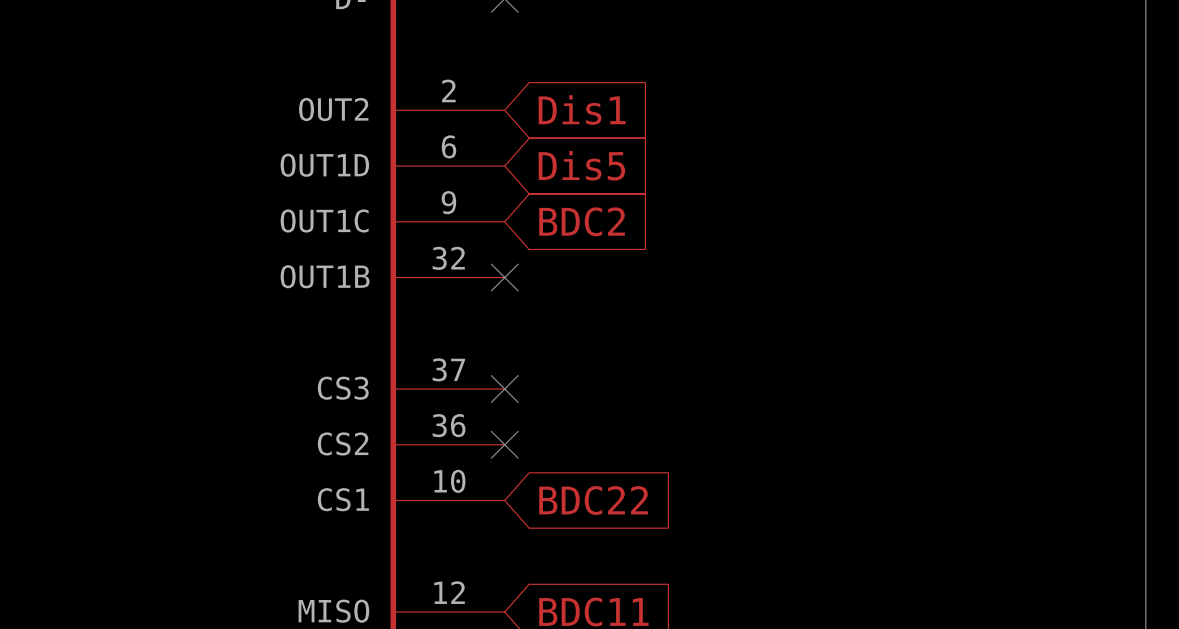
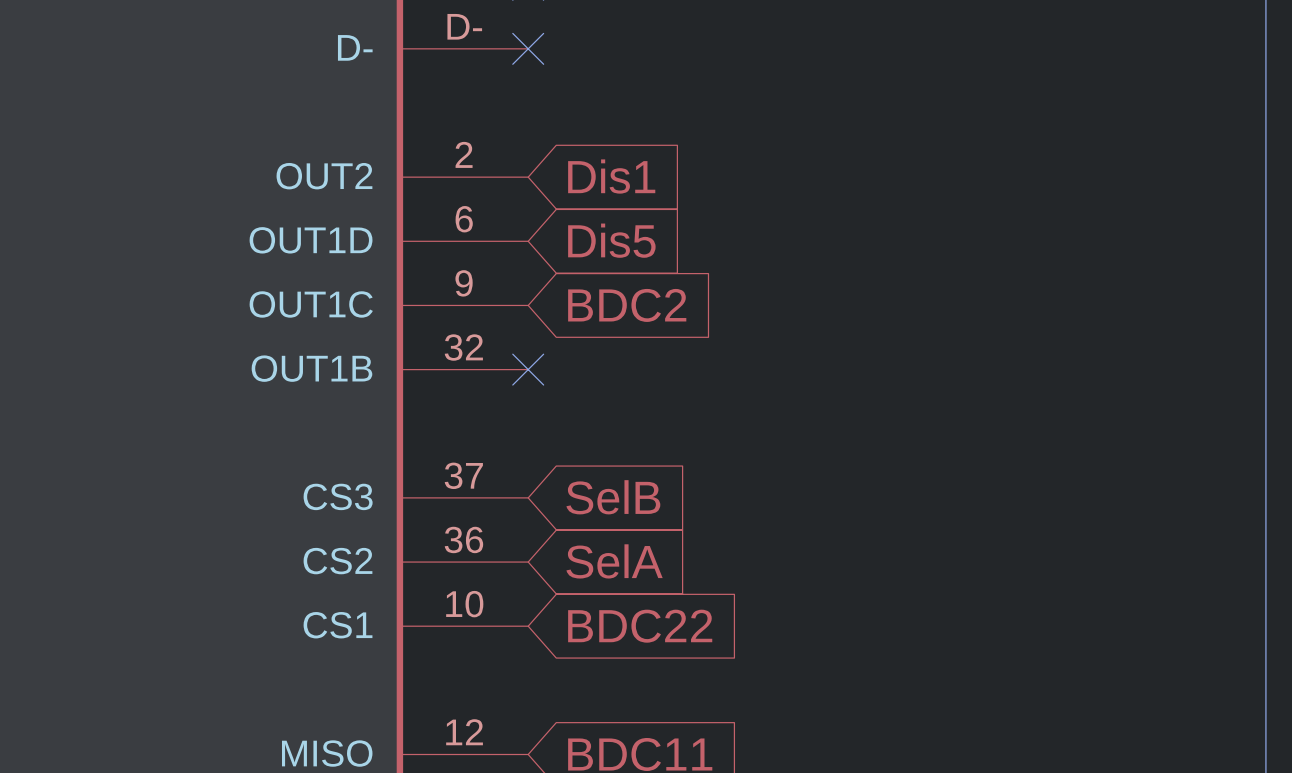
global label: none -> SelB (613, 497)
no-connect mark: (504, 389) -> none
no-connect mark: (504, 444) -> none
global label: none -> SelA (614, 561)

